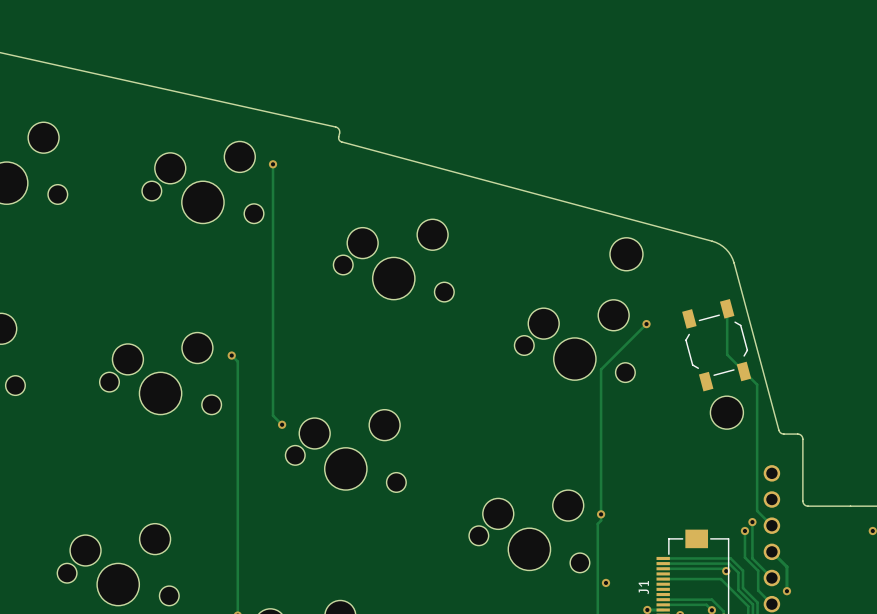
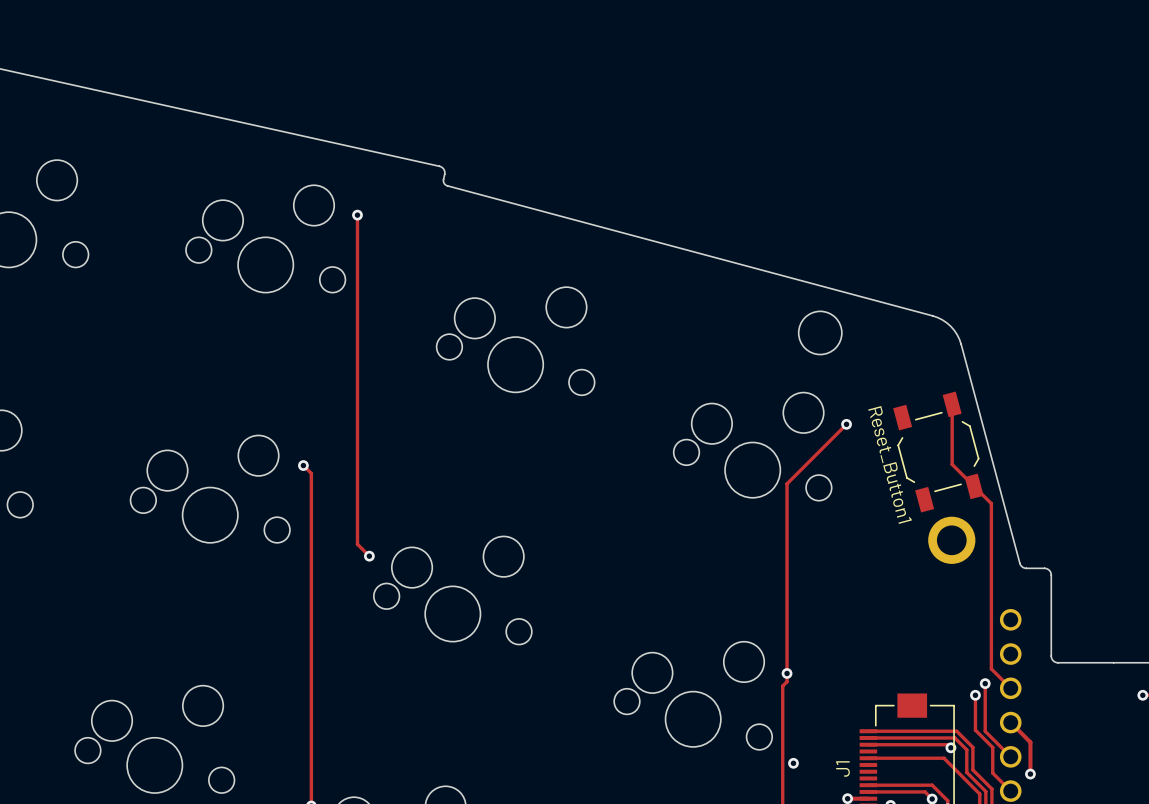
Reset_Button1 name: none -> Reset_Button1 (890, 464)
part footprint: [710, 396, 744, 430] -> [928, 516, 976, 564]

